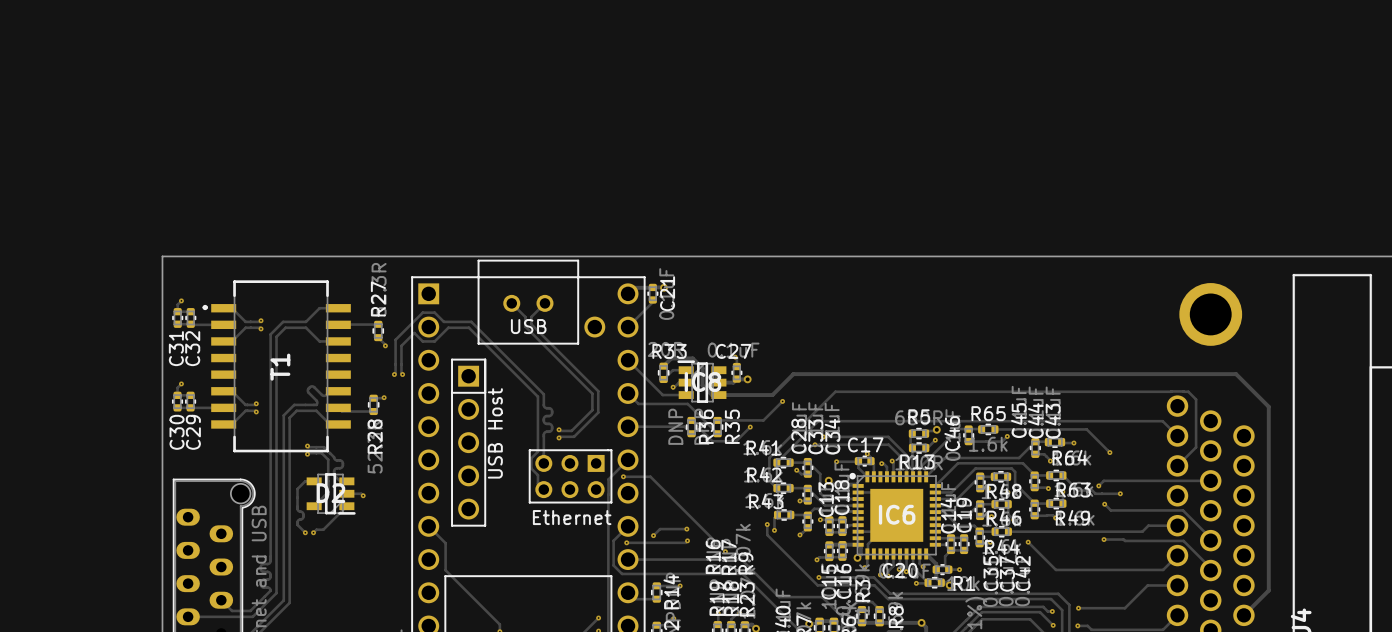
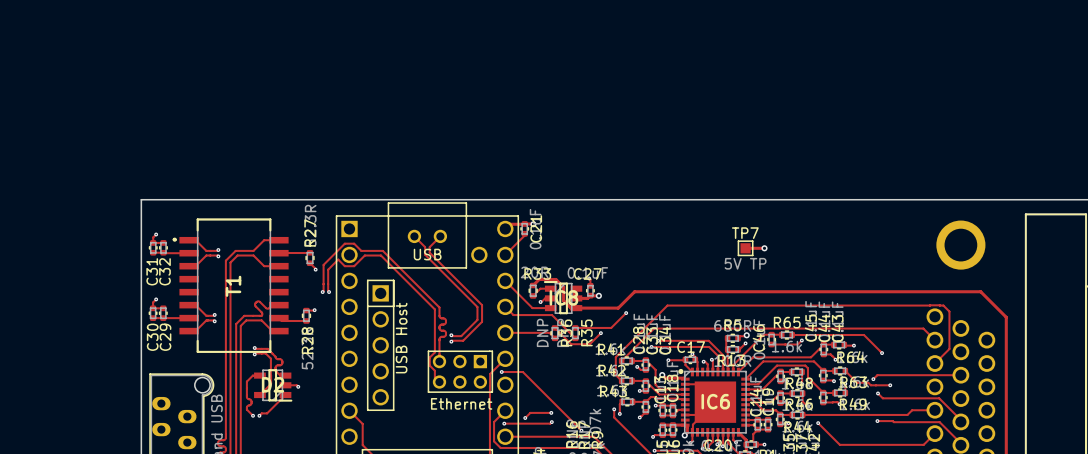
track: none -> (745, 248) (764, 248)
TP7: none -> 5V TP (745, 248)
via: none -> (764, 248)

